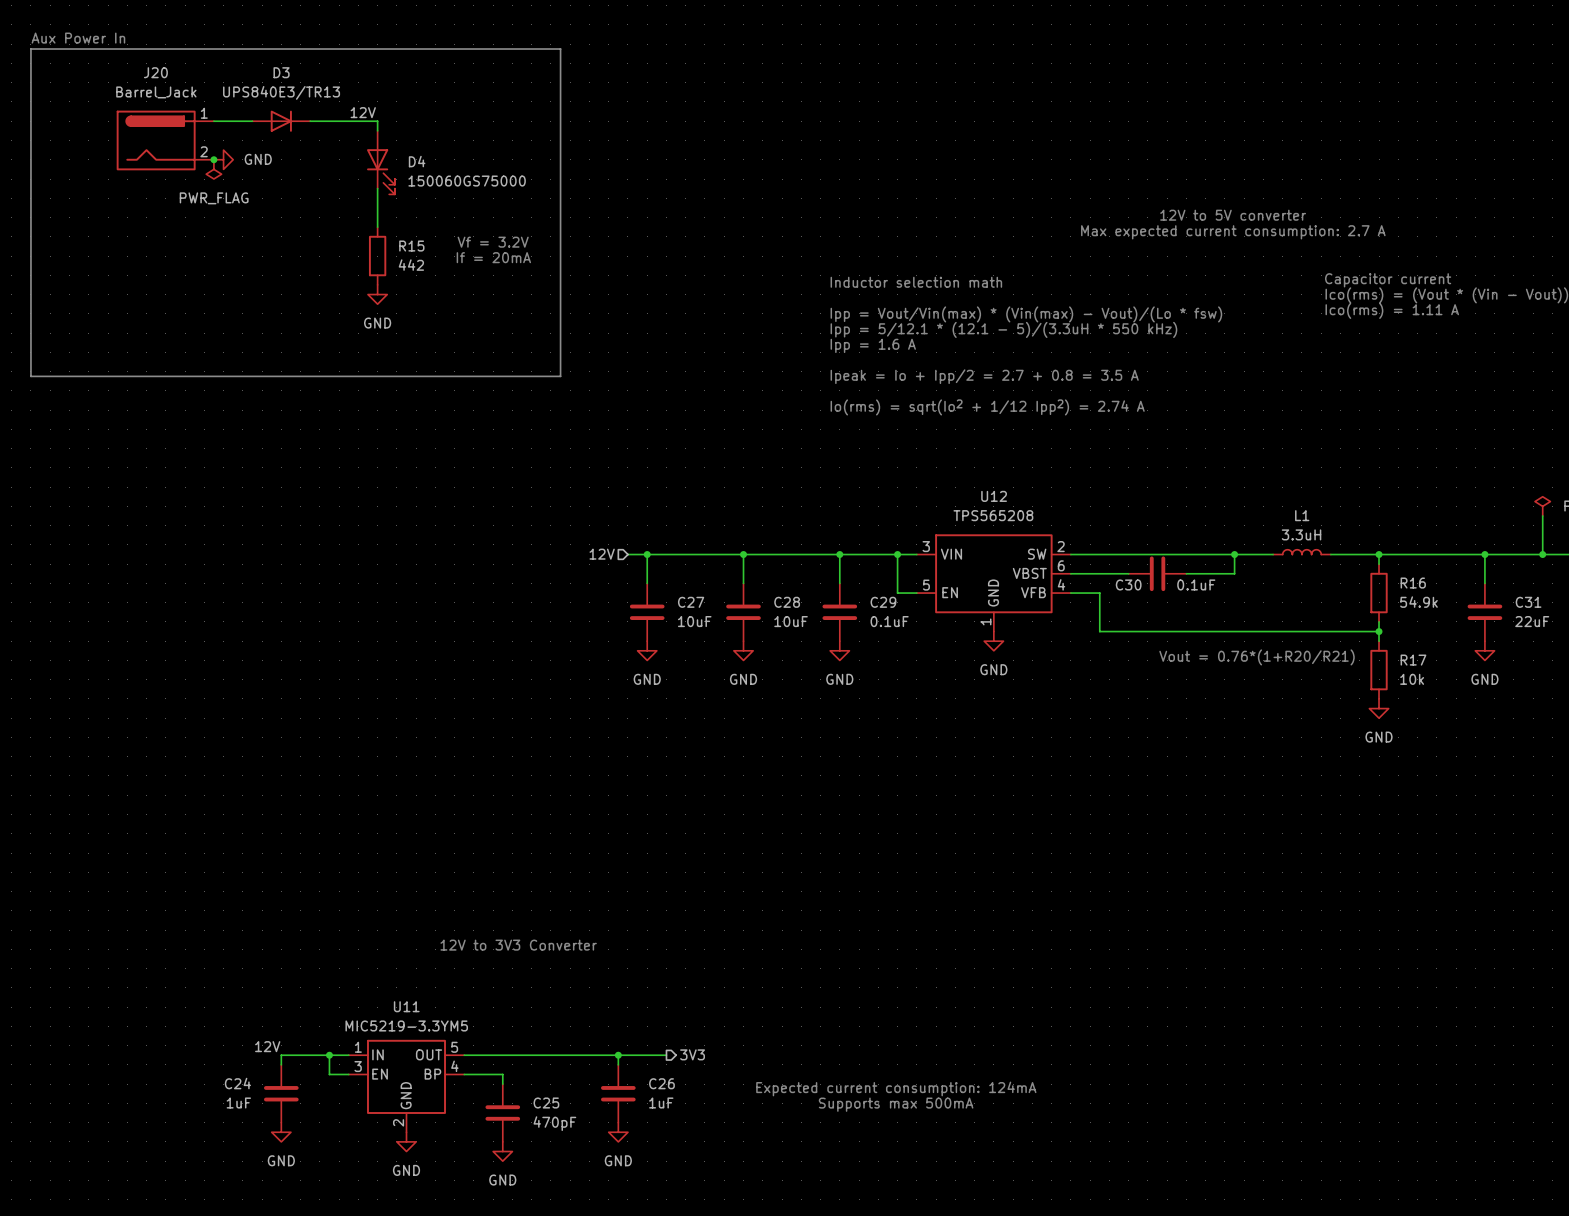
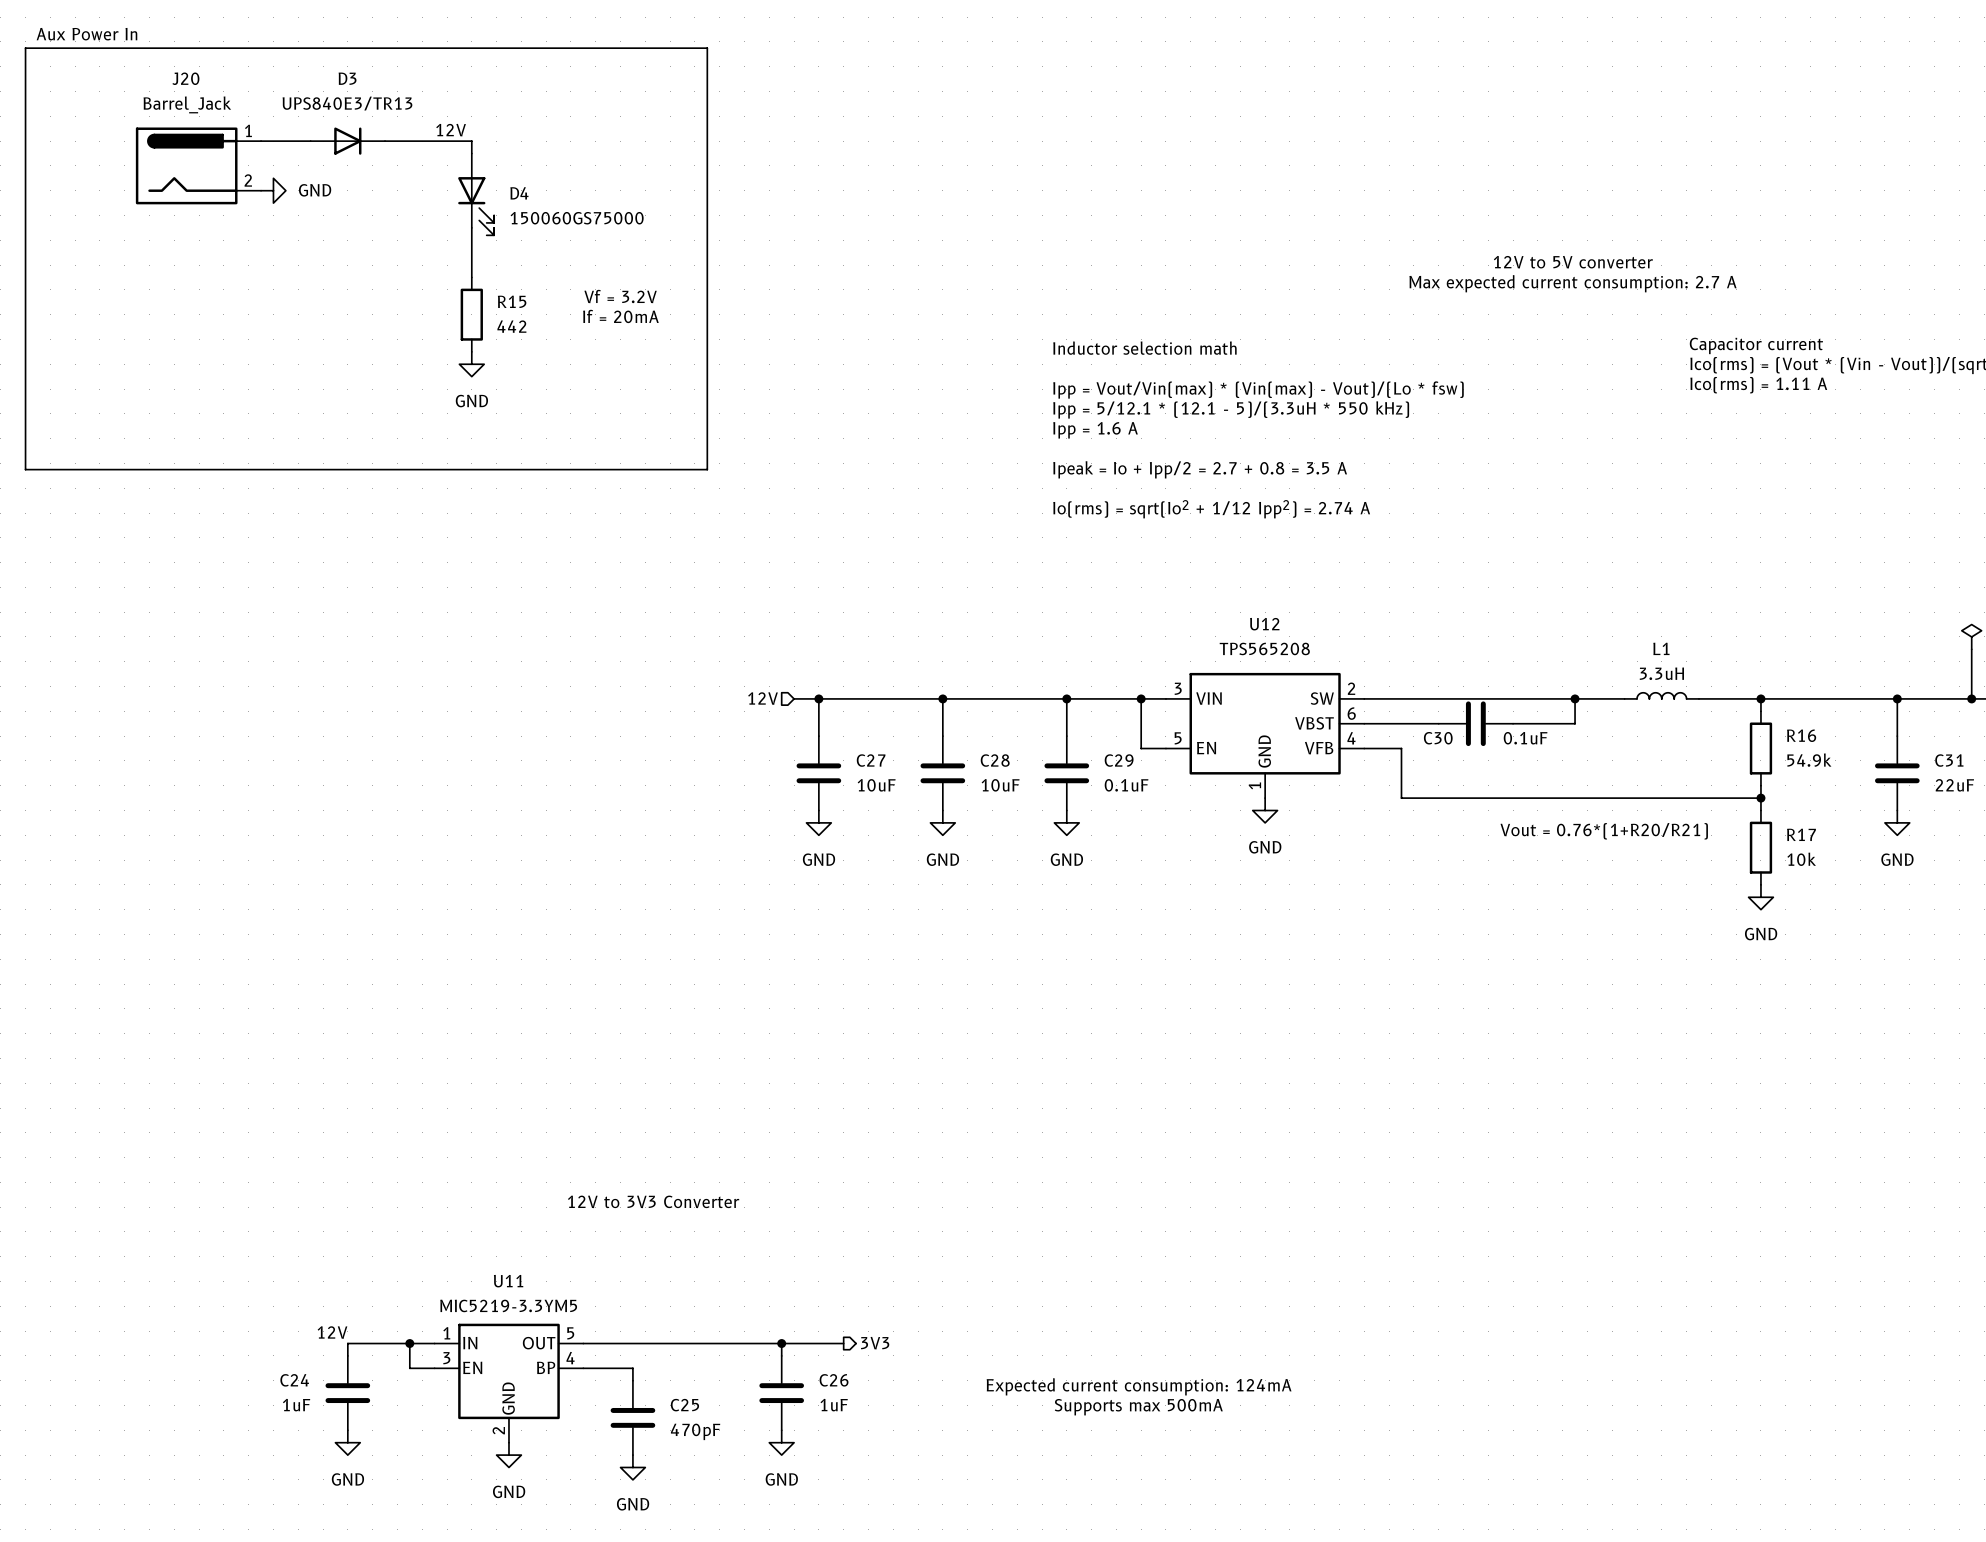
junction: (213, 159) -> none
power symbol: PWR_FLAG (213, 169) -> none

